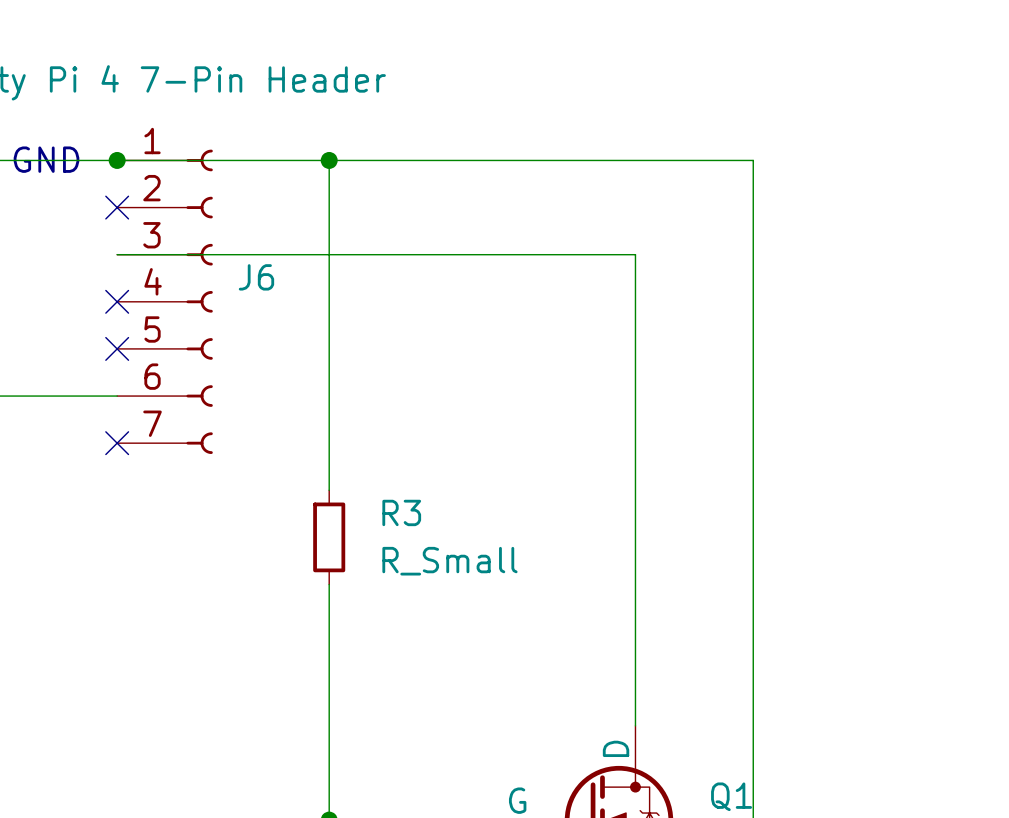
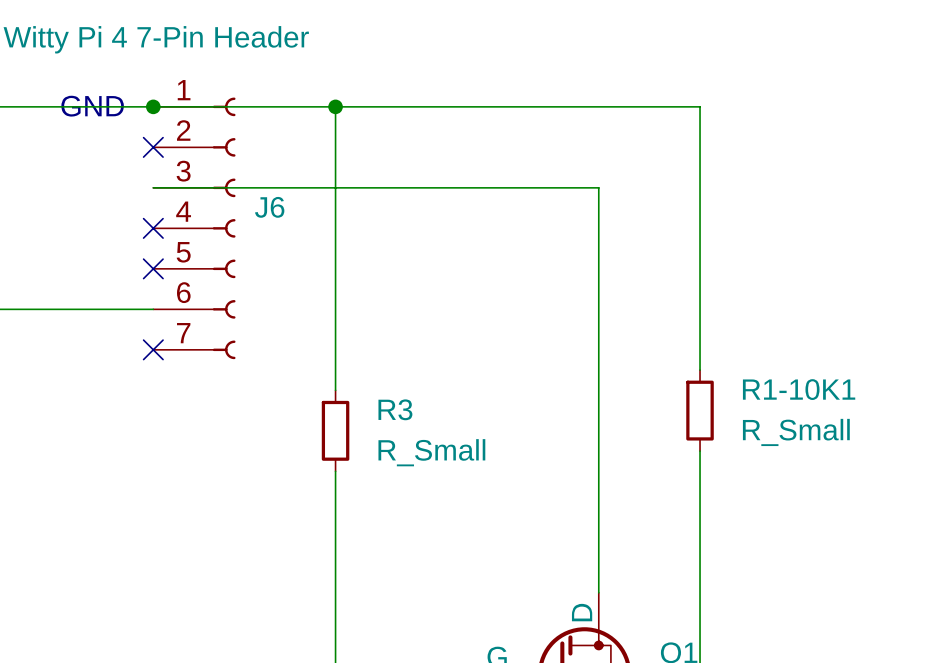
wire: (753, 466) (753, 560) -> none
R1-10K1: none -> R_Small (700, 410)

